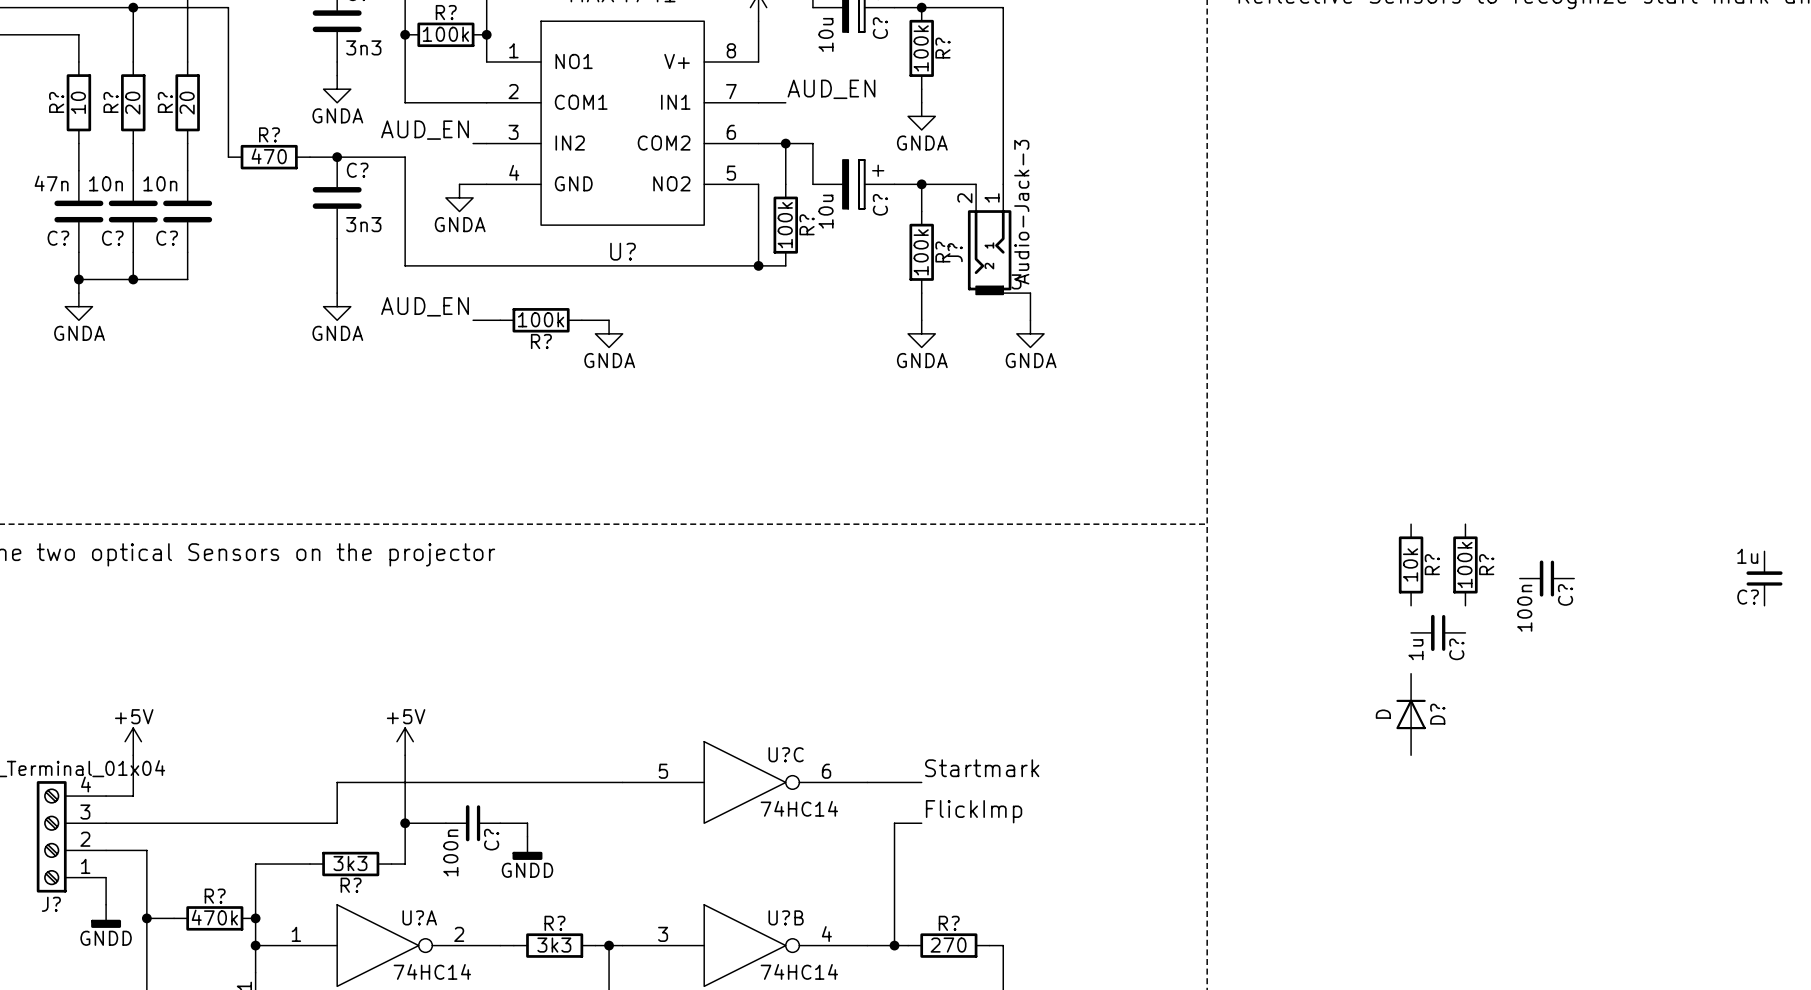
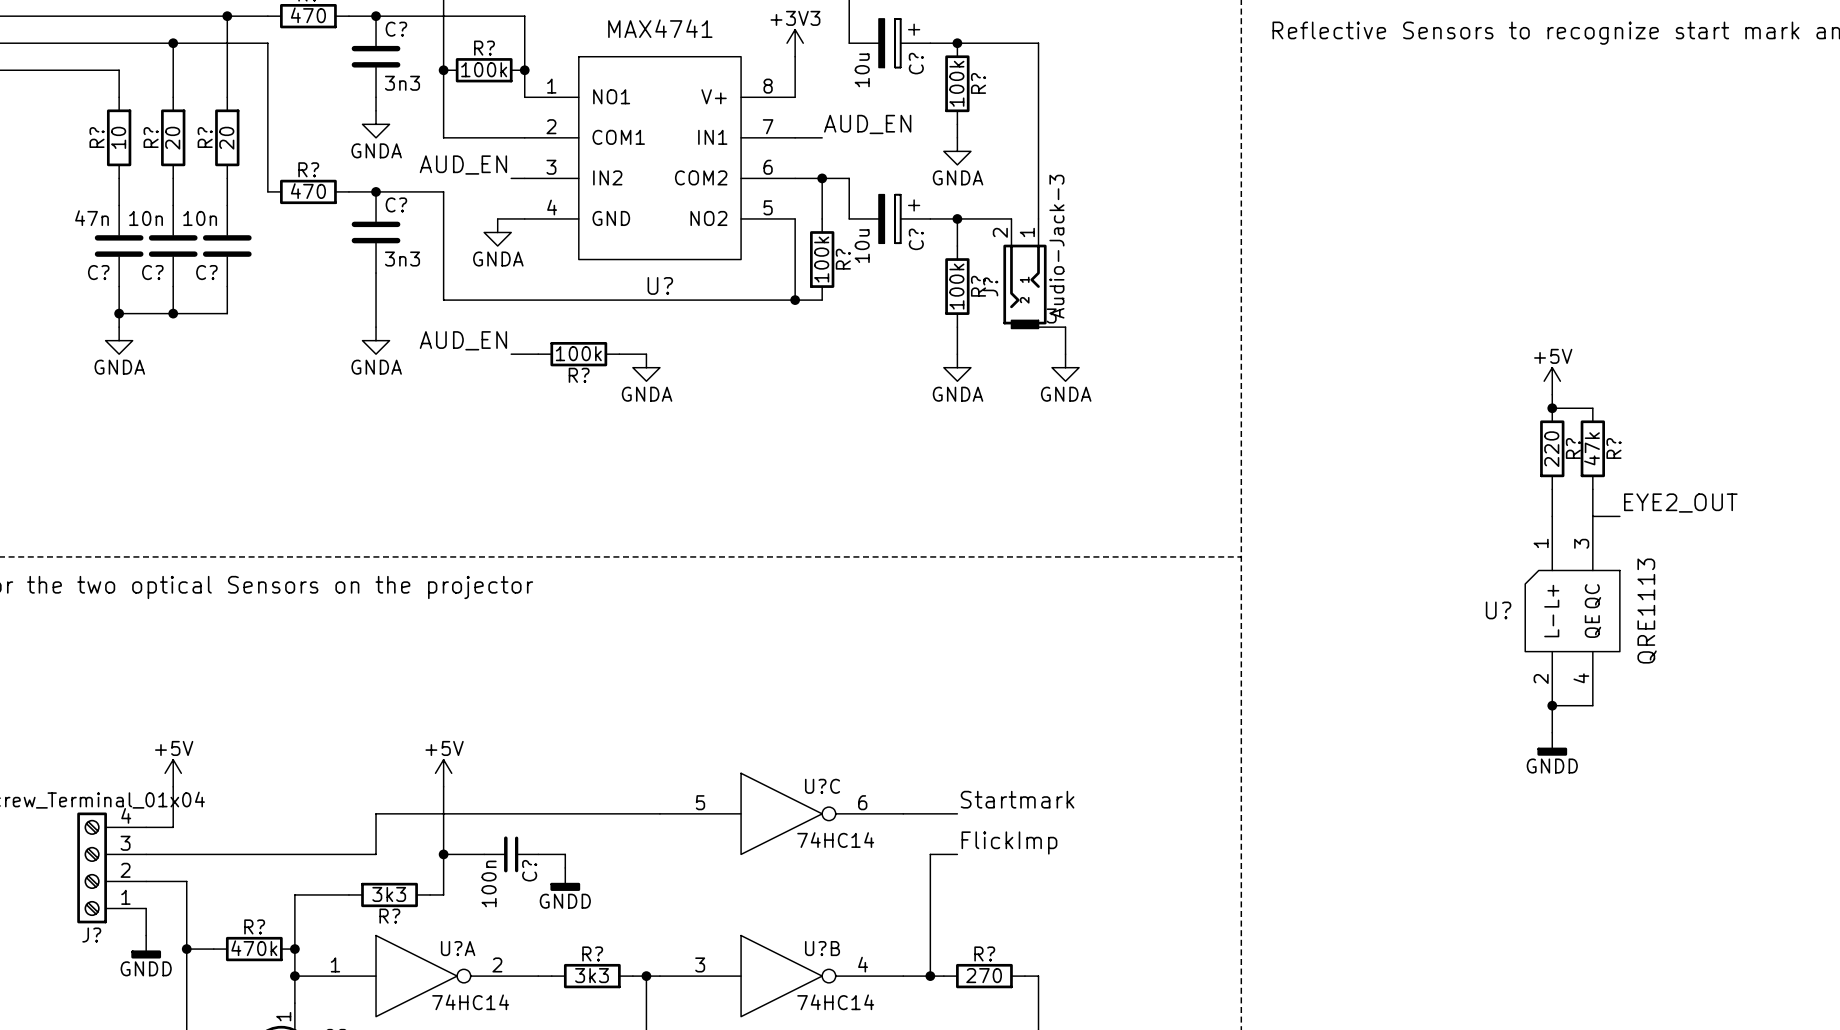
power symbol: none -> +5V (1552, 381)
wire: none -> (1552, 394) (1552, 408) (1592, 408)
junction: none -> (1552, 408)
R?: none -> 220 (1552, 448)
R?: none -> 47k (1592, 448)
wire: none -> (1552, 489) (1552, 516)
wire: none -> (1592, 489) (1592, 516) (1619, 516)
label: none -> EYE2_OUT (1680, 503)
R?: 10k (1411, 564) -> none
R?: 100k (1465, 564) -> none
U?: none -> QRE1113 (1572, 611)
C?: 100n (1547, 578) -> none
C?: 1u (1764, 578) -> none
C?: 1u (1438, 632) -> none
junction: none -> (1552, 705)
wire: none -> (1592, 705) (1552, 705) (1552, 732)
power symbol: none -> GNDD (1552, 744)
D?: D (1411, 714) -> none

